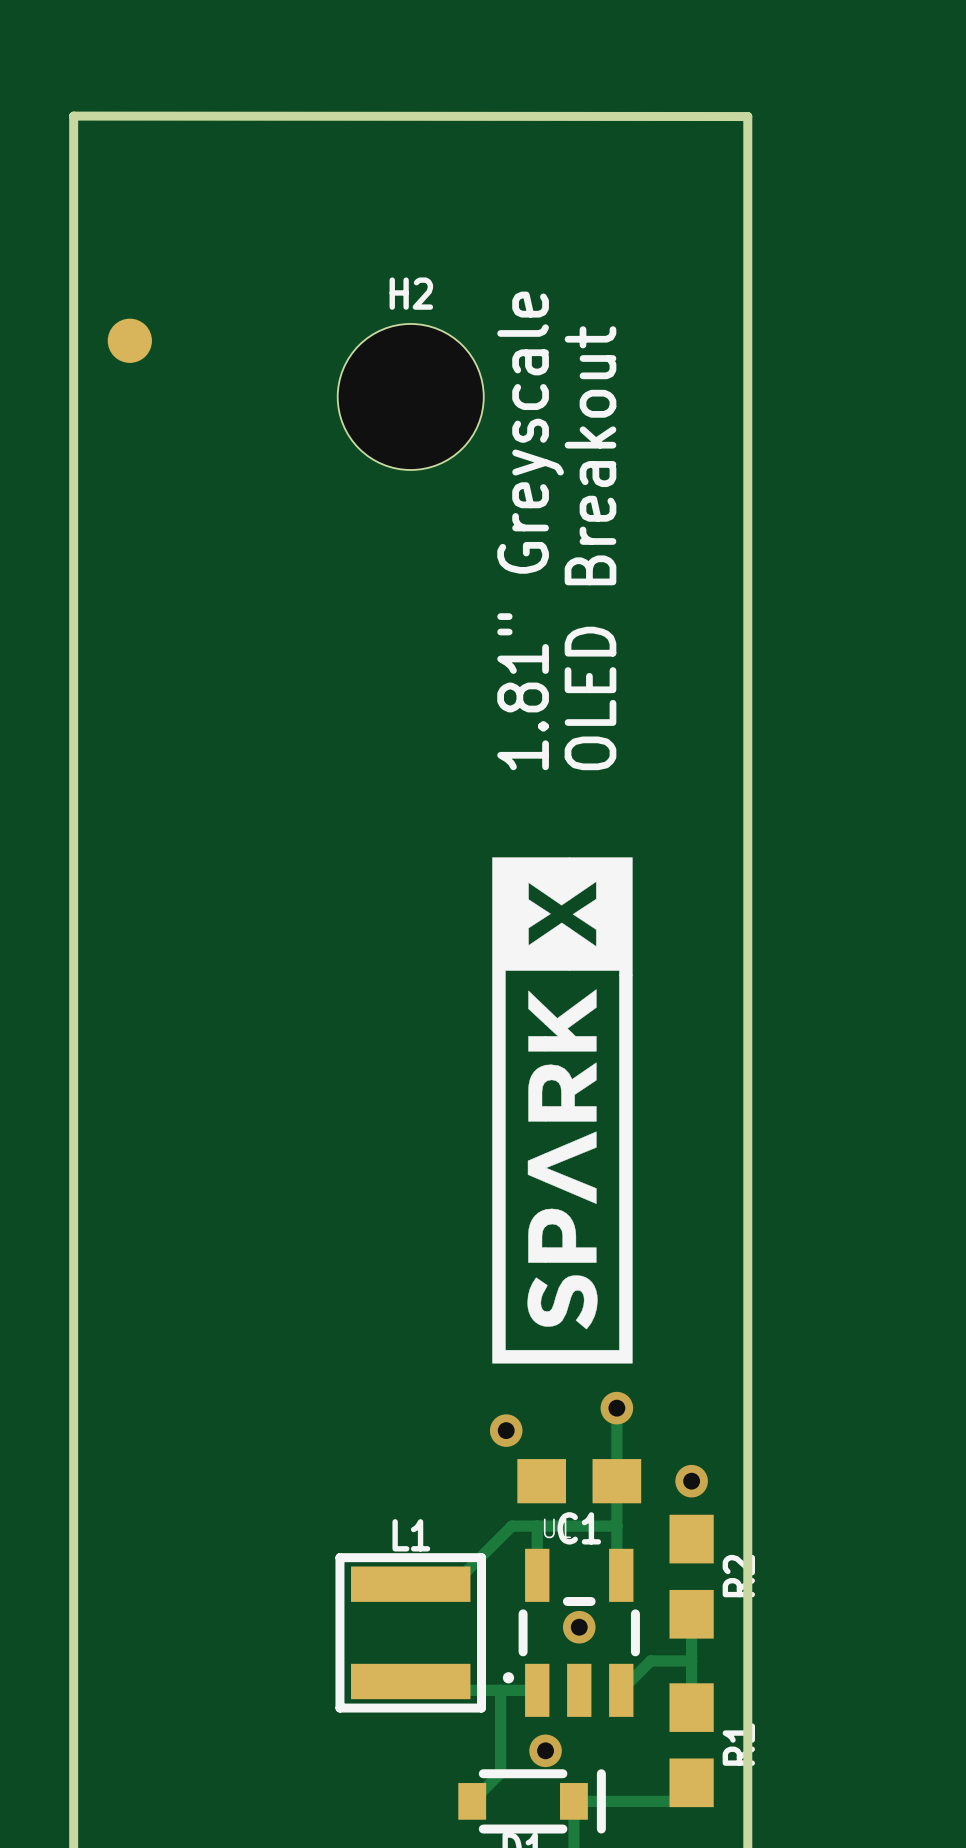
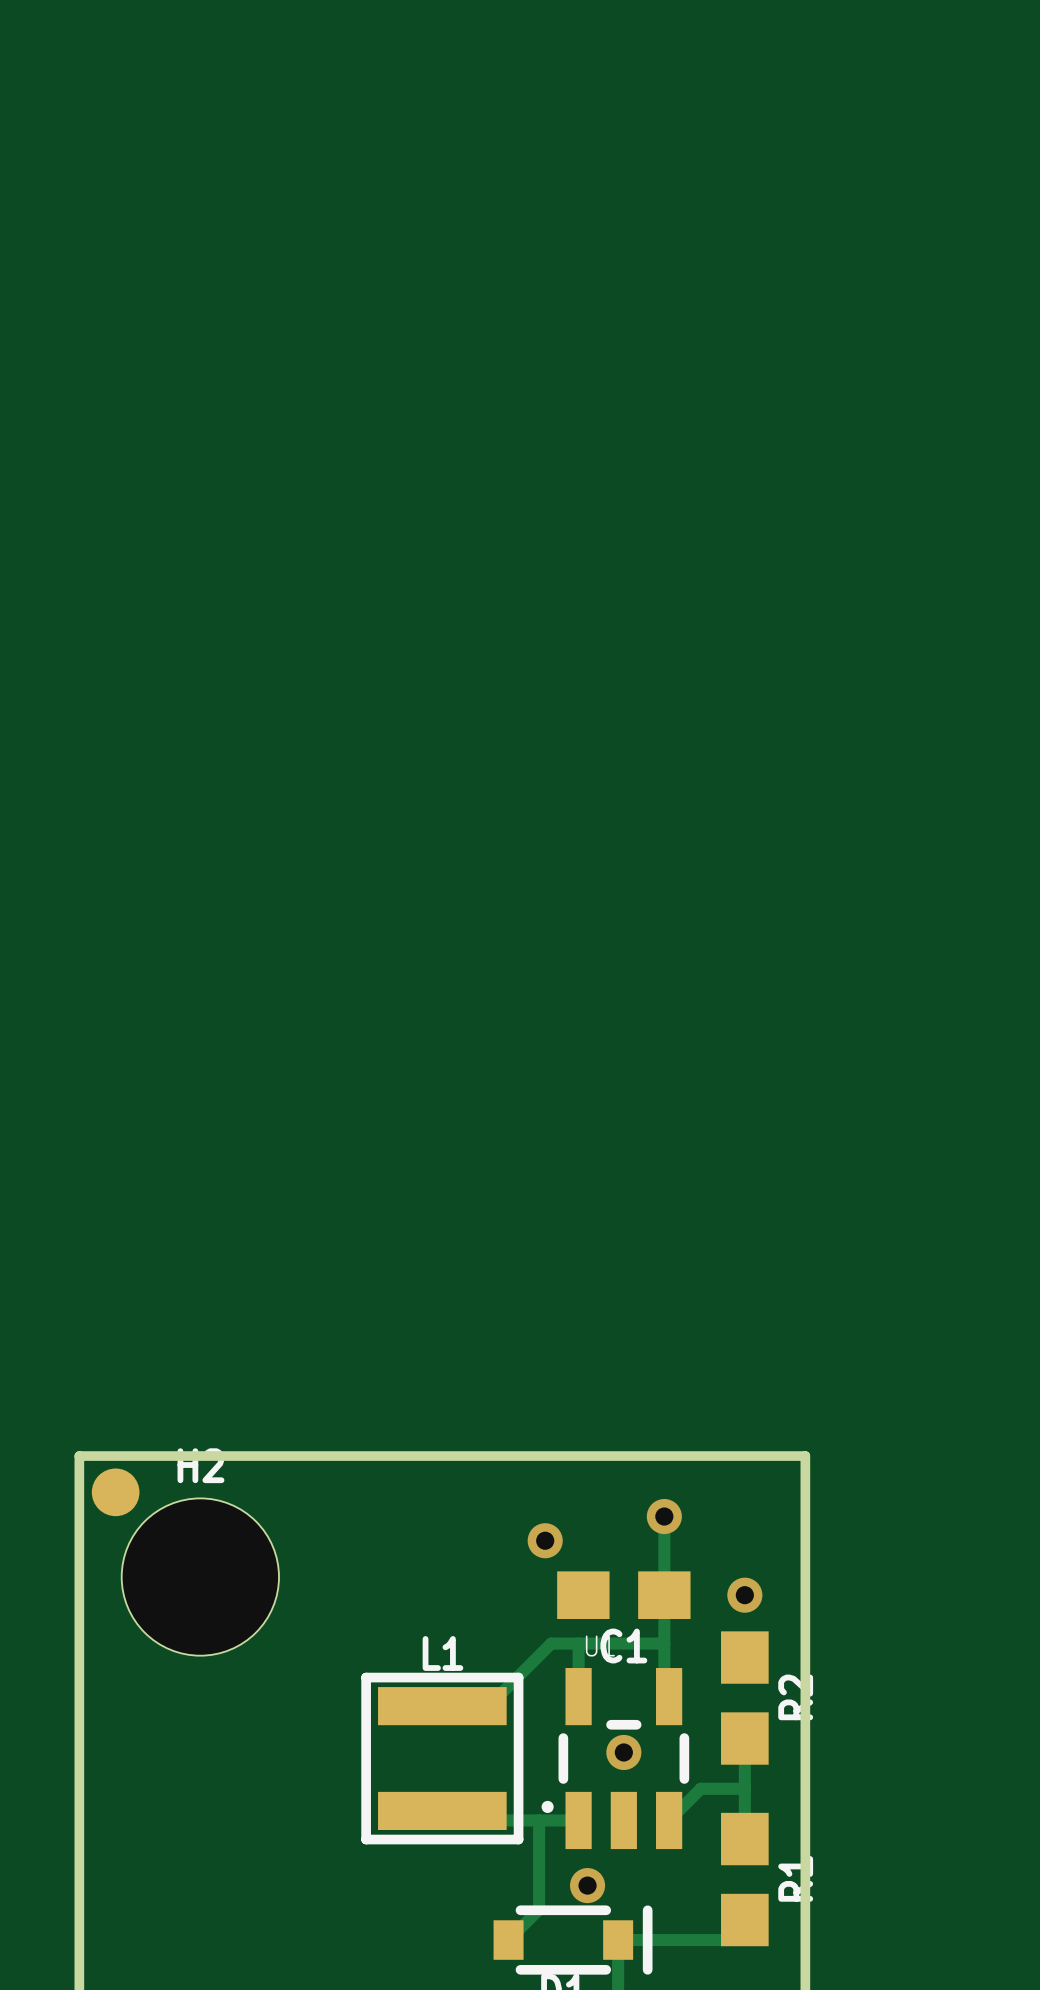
part position: (129, 340) -> (115, 1492)
H2 position: (410, 396) -> (200, 1577)
text: 1.81" Greyscale (530, 530) -> none
text: OLED Breakout (590, 548) -> none
drawing: [492, 857, 633, 1364] -> none
board edge: (73, 1351) (73, 116) (747, 116) (747, 1351) -> (79, 1456) (805, 1456)

